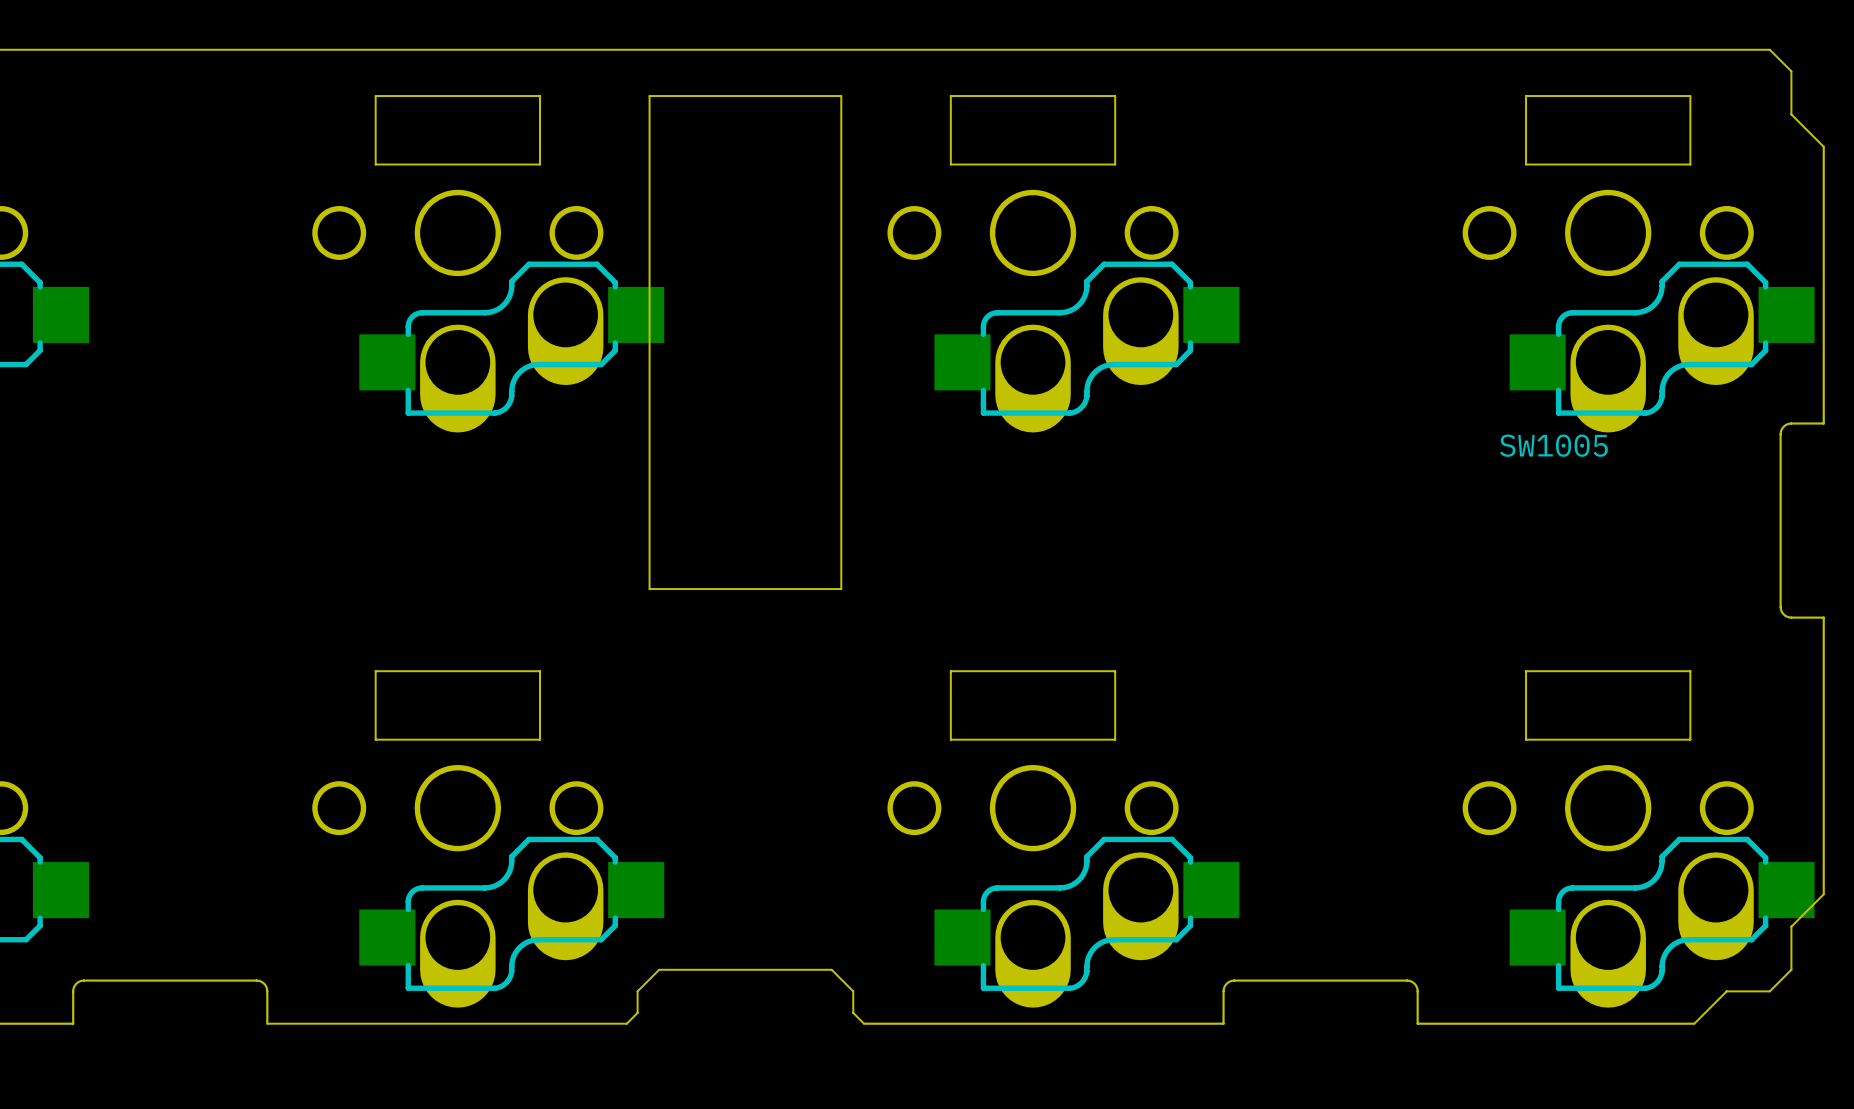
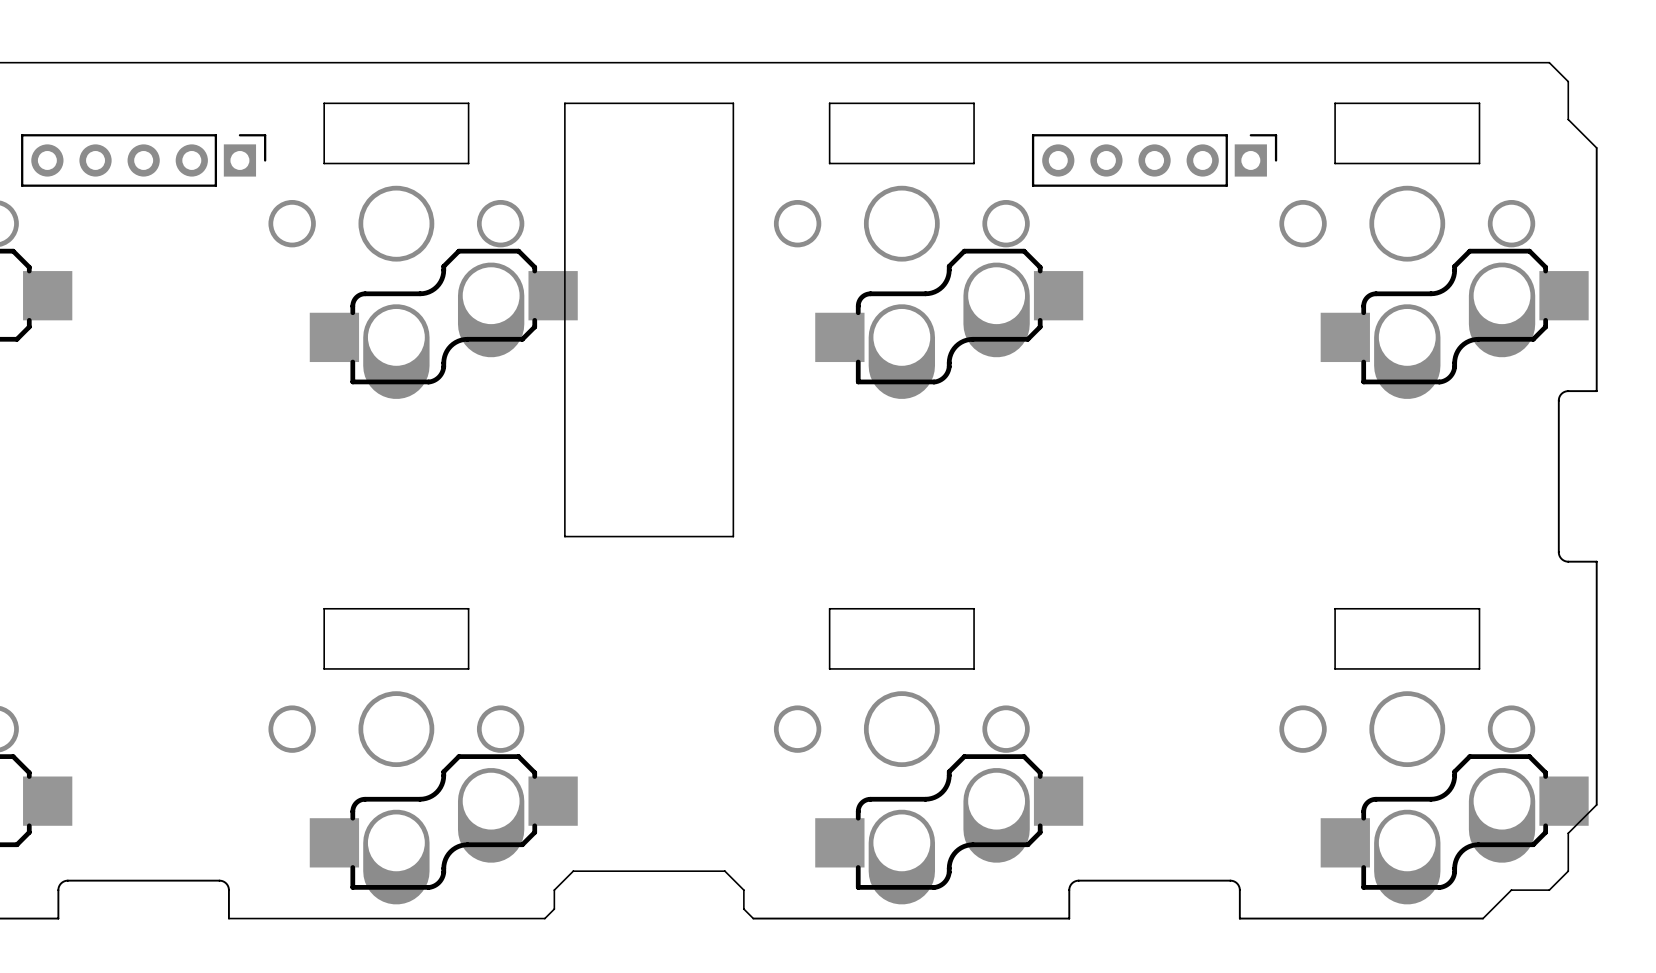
part: none -> (143, 160)
part: none -> (1154, 160)
SW1005 name: SW1005 (1553, 445) -> none

